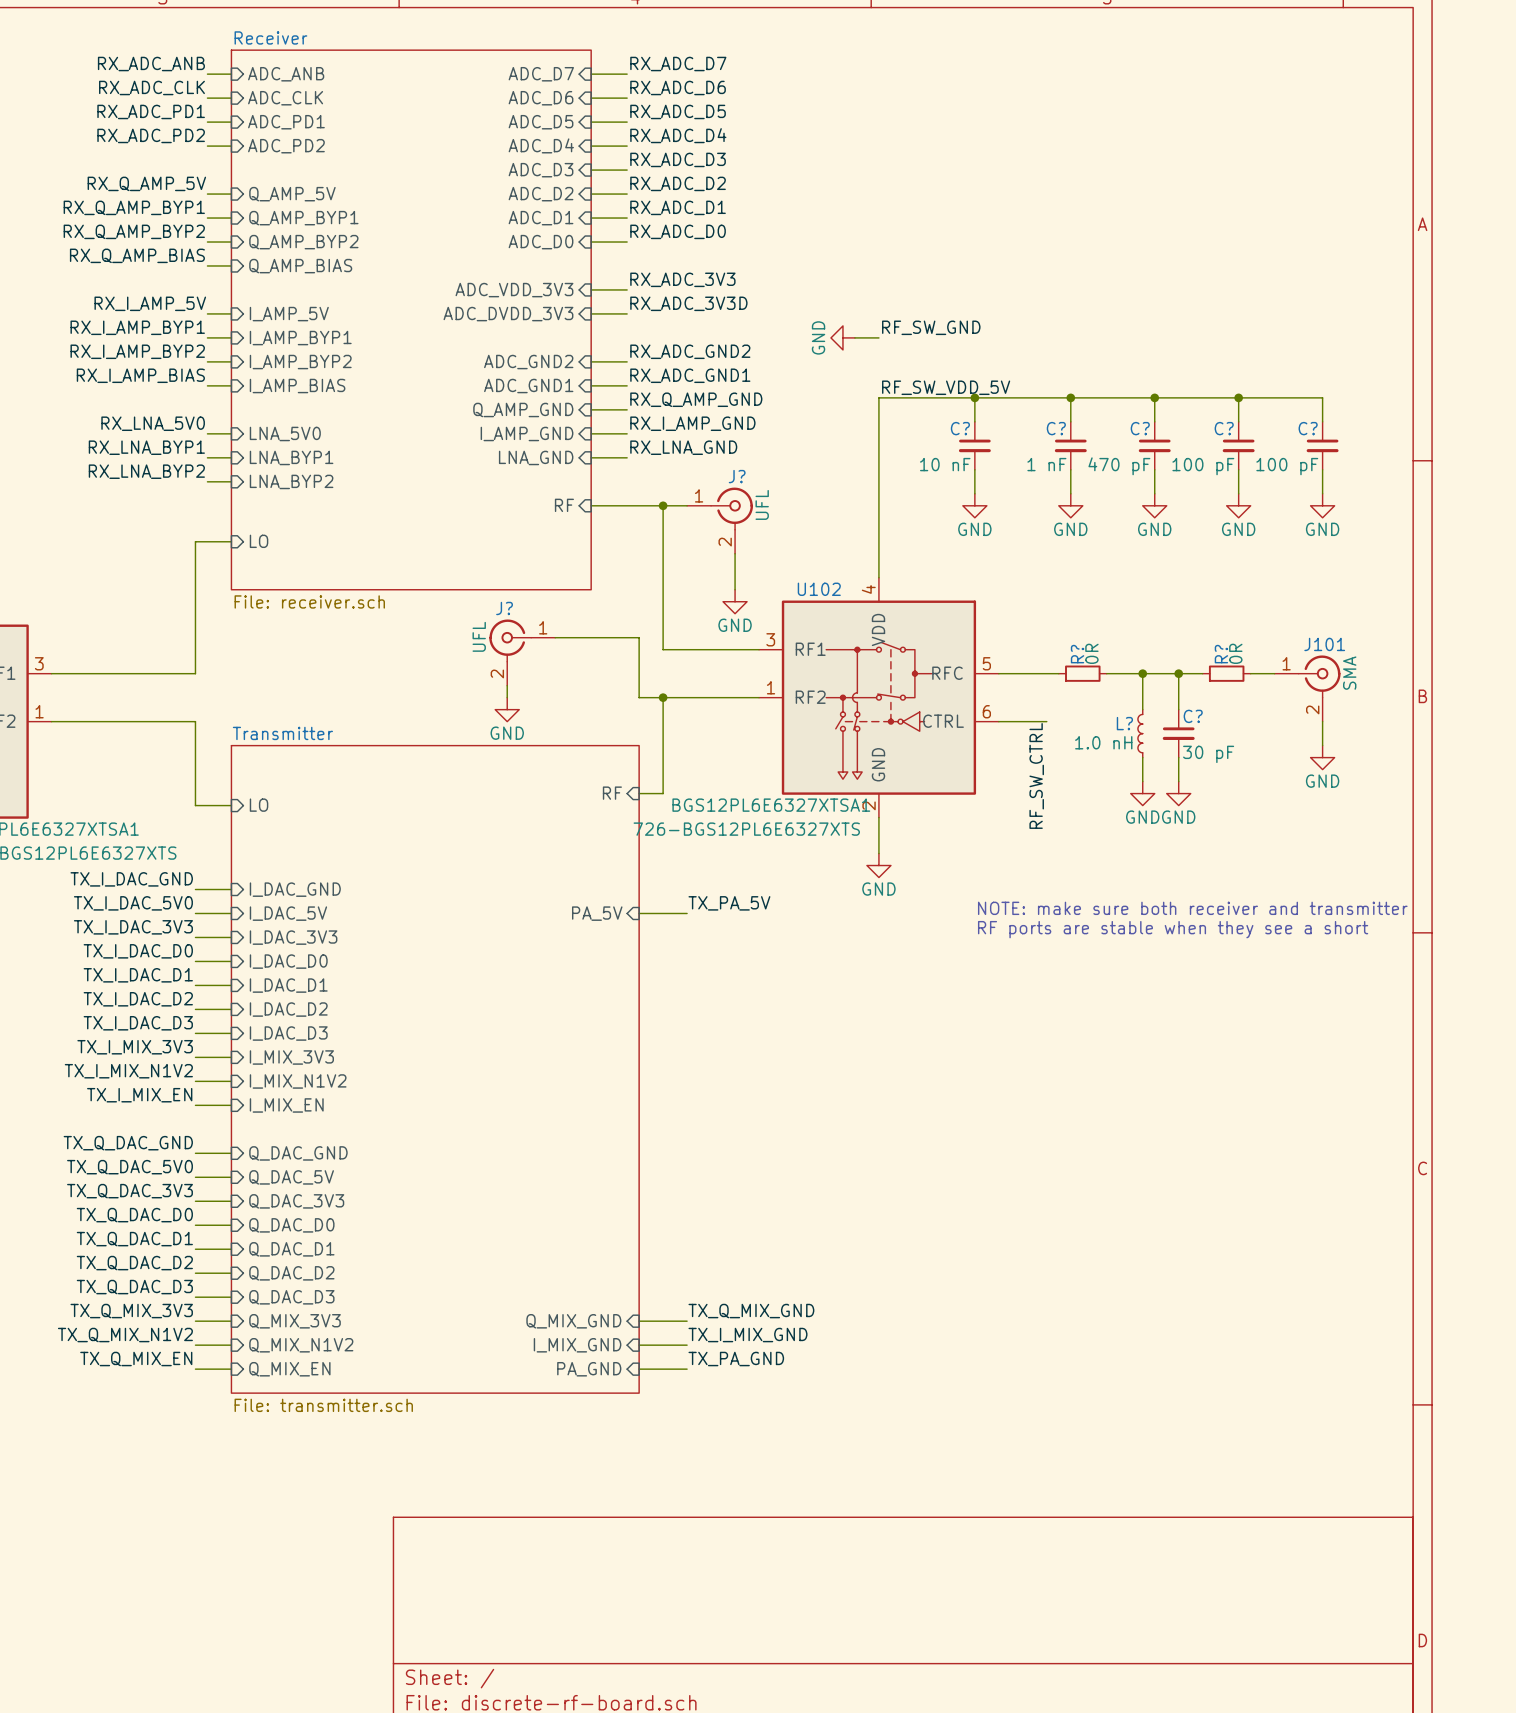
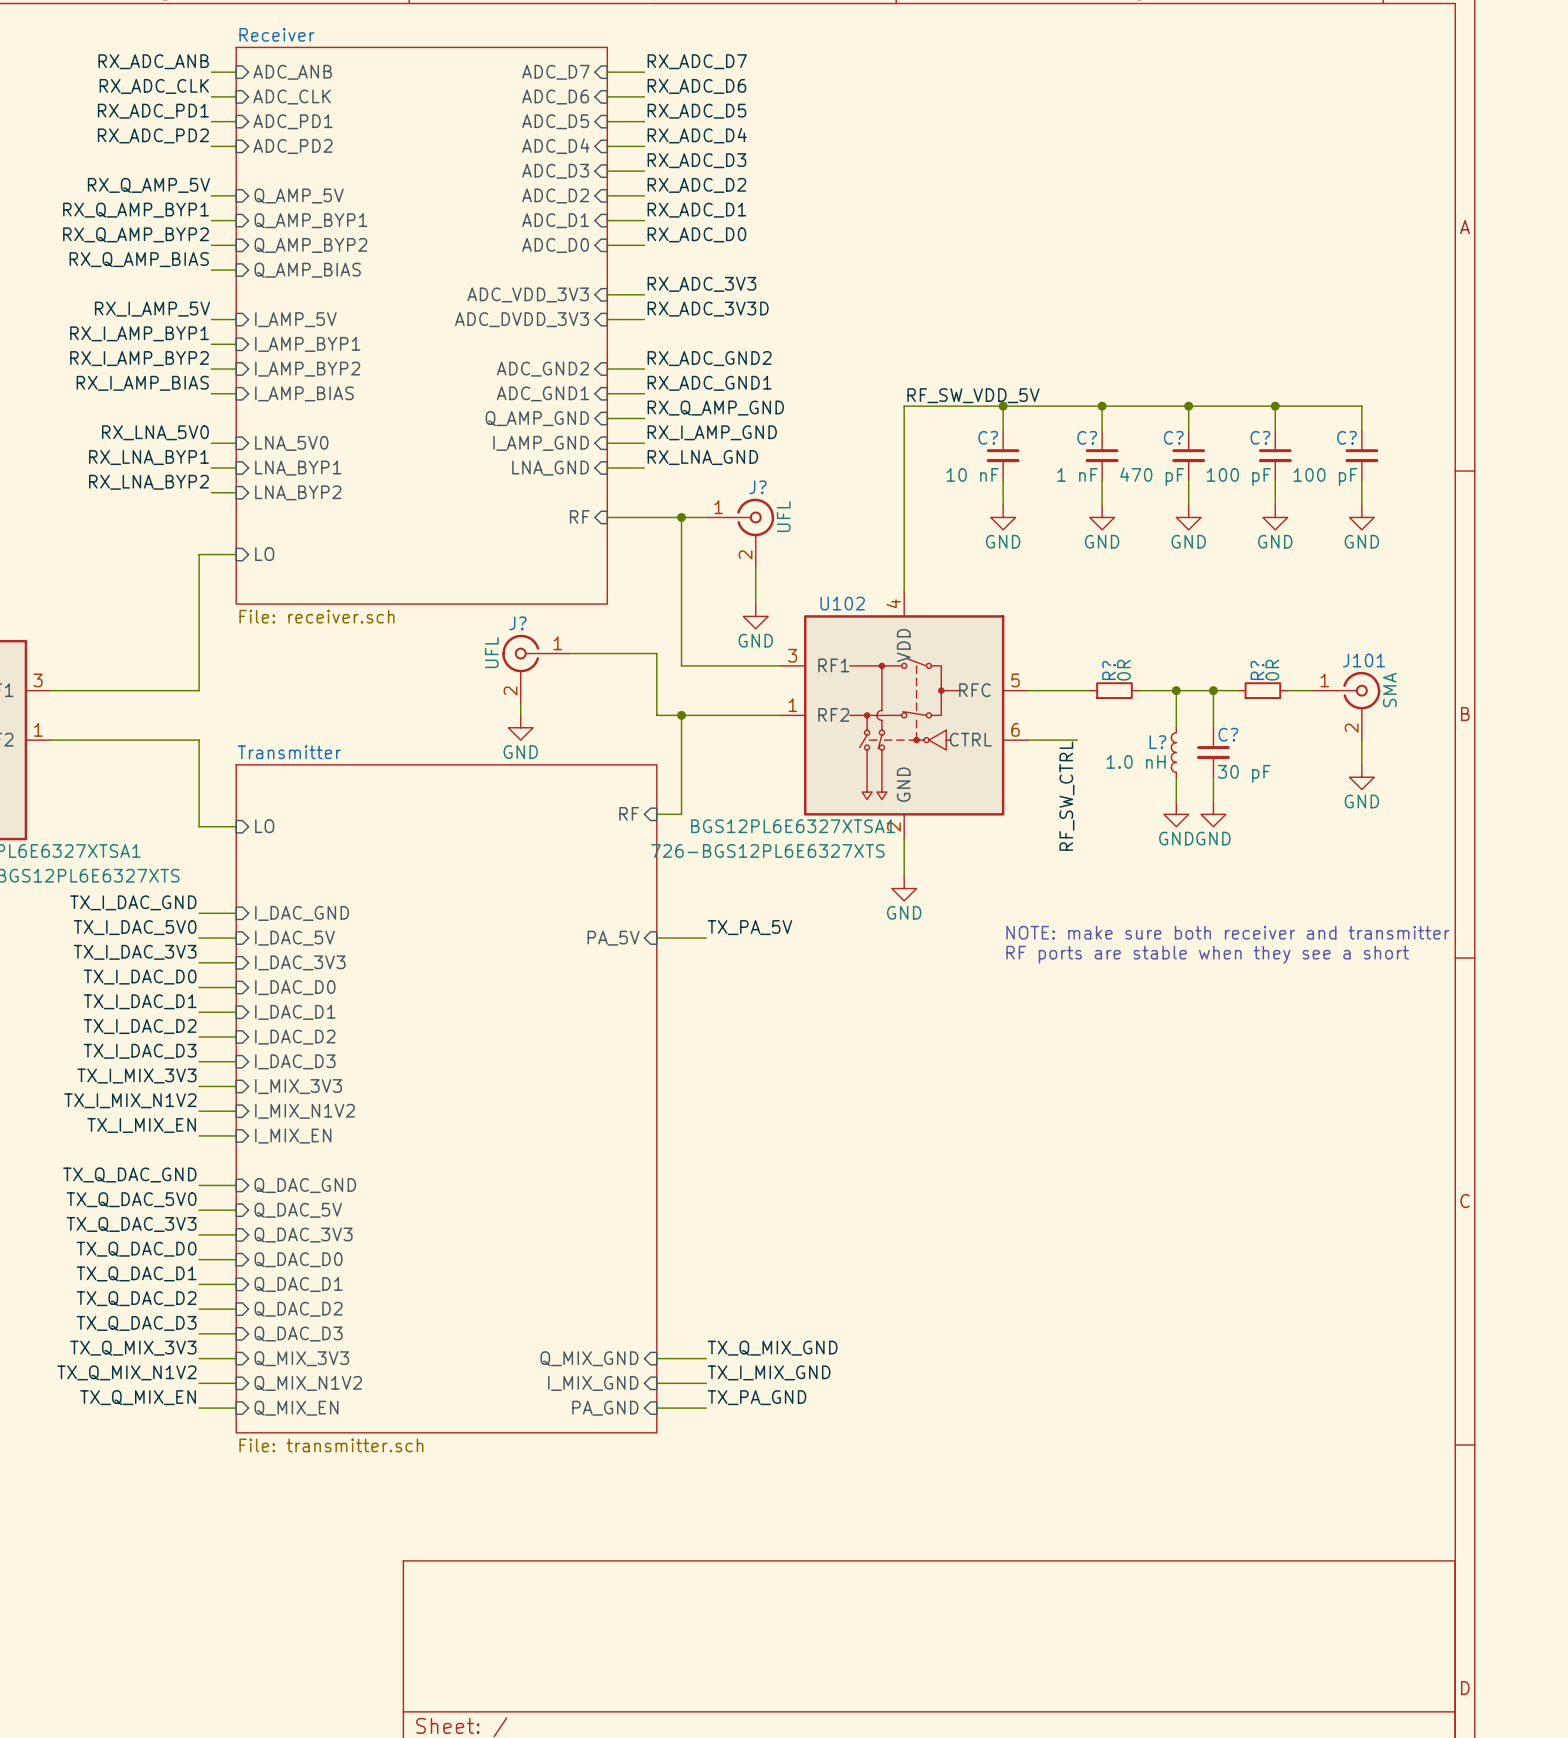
label: RF_SW_GND (931, 327) -> none
power symbol: GND (842, 337) -> none
wire: (854, 337) (878, 337) -> none

